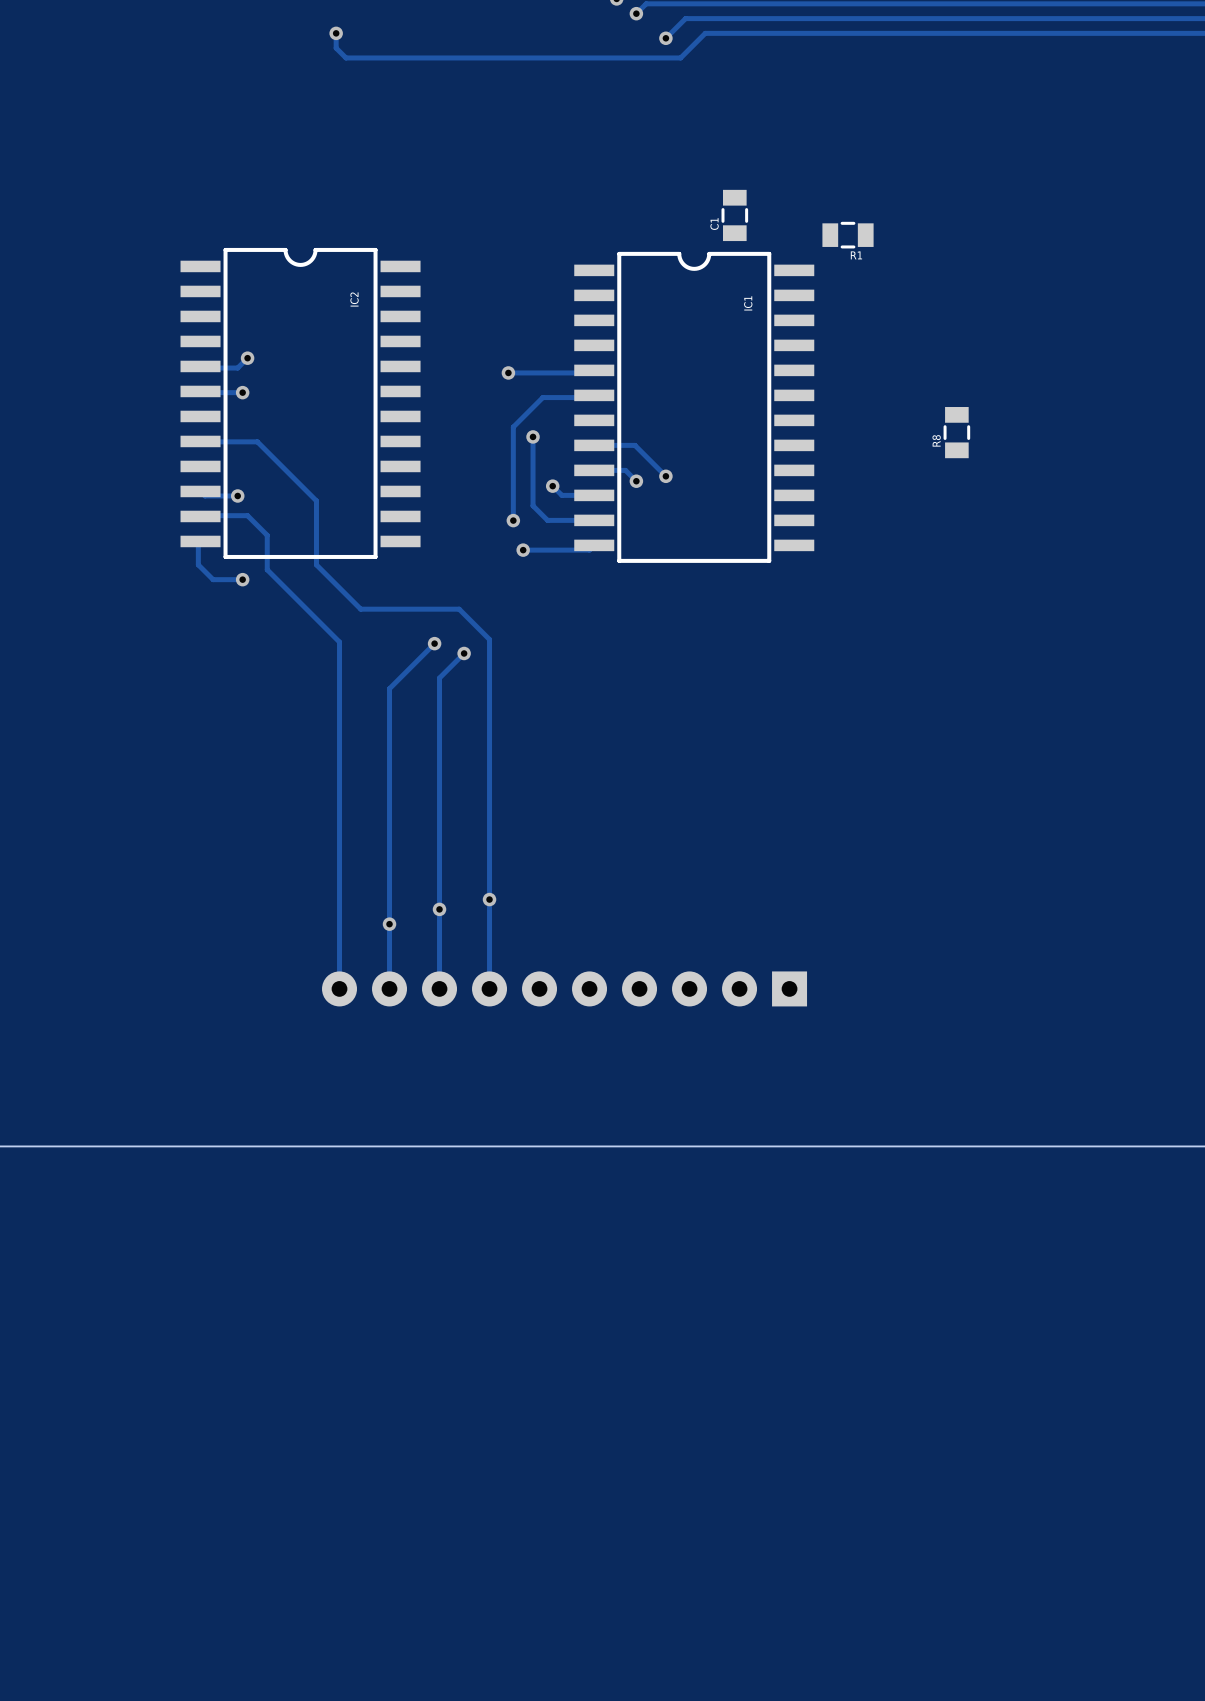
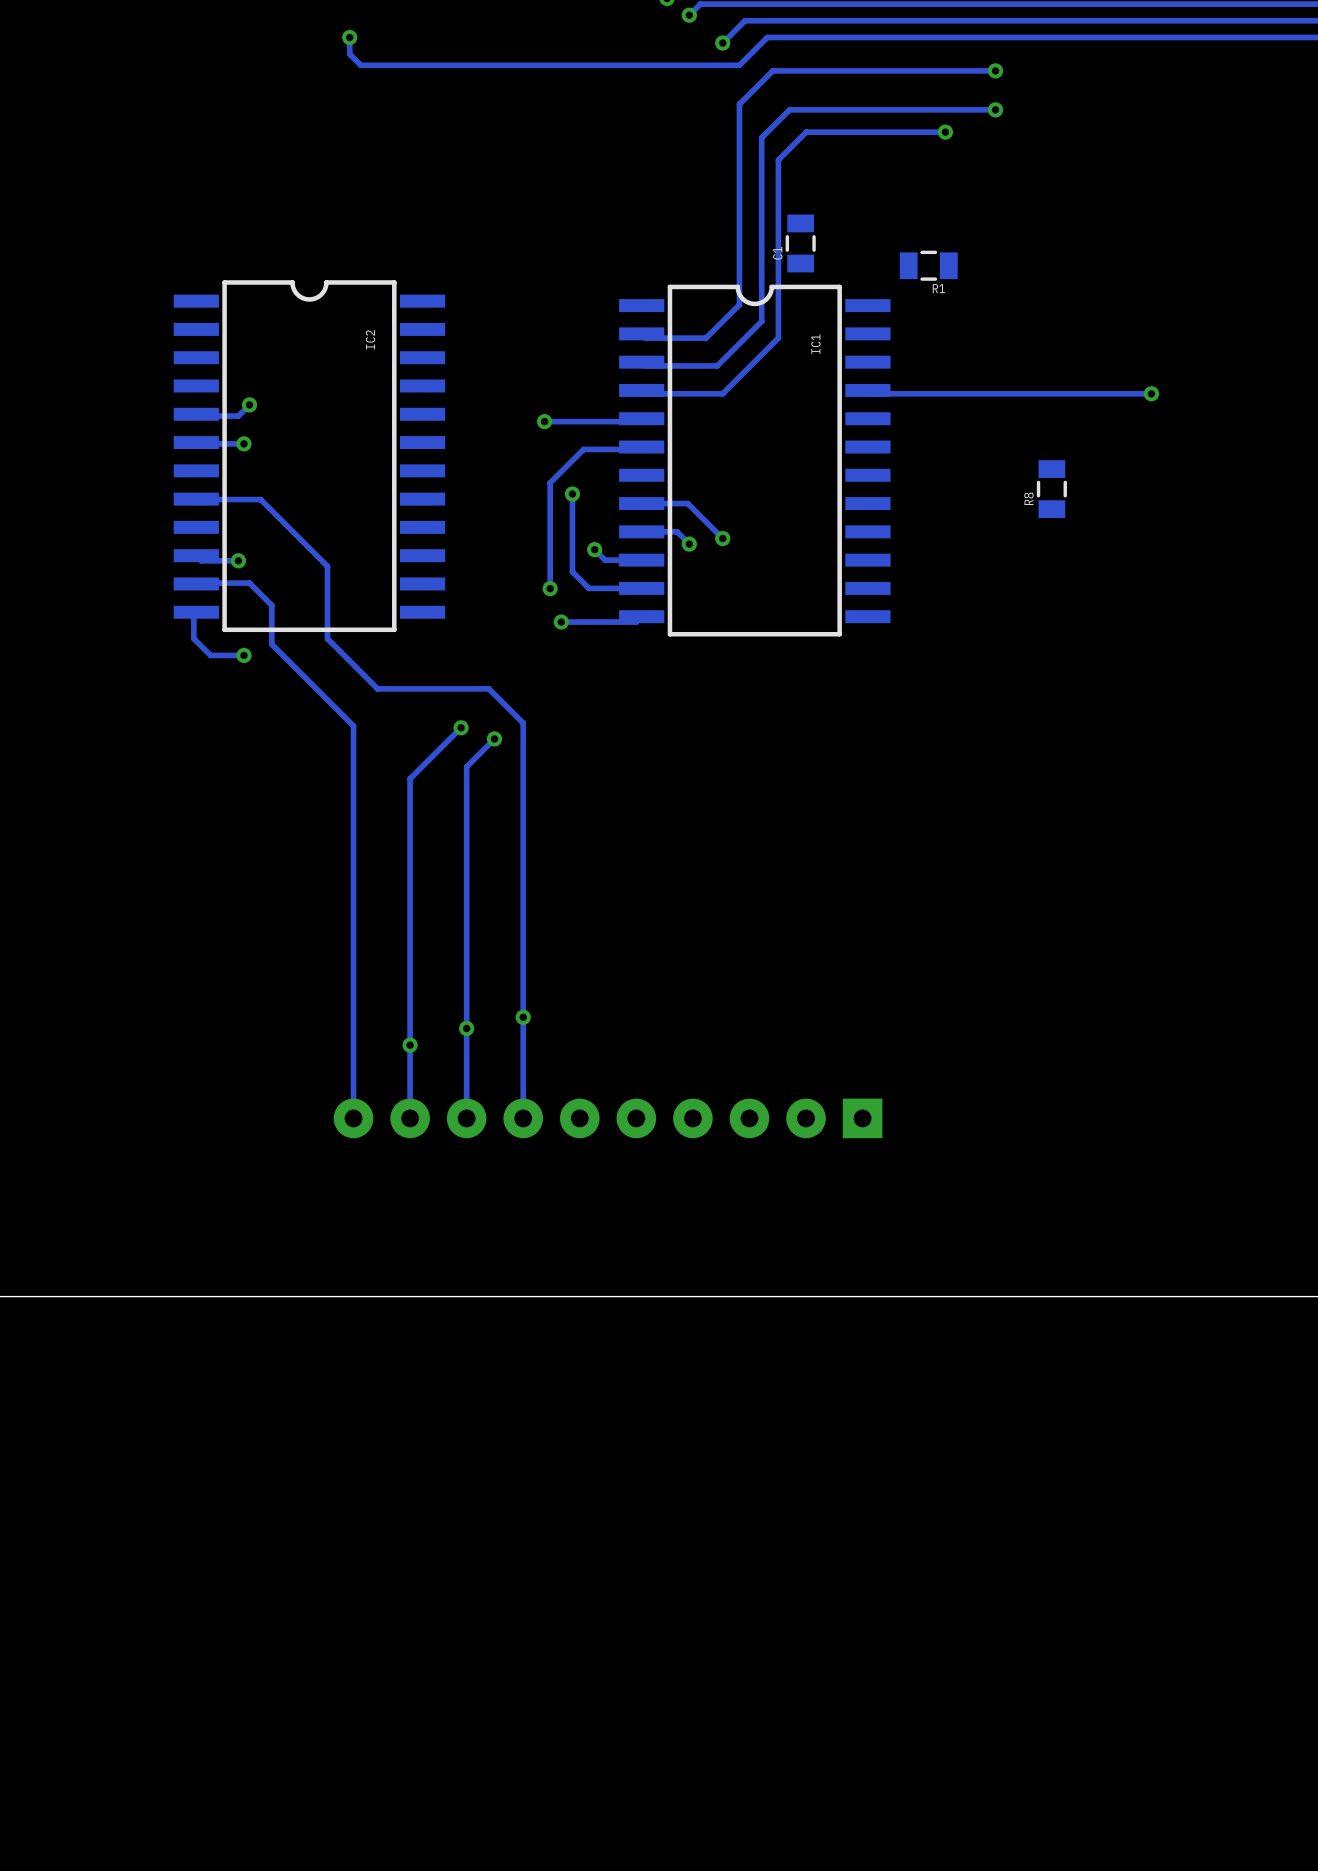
track: none -> (995, 70) (772, 70) (739, 104) (739, 304) (706, 338) (645, 338) (641, 333)
via: none -> (995, 70)
track: none -> (995, 109) (789, 109) (761, 137) (761, 321) (717, 365) (645, 365) (641, 362)
via: none -> (995, 109)
track: none -> (945, 132) (806, 132) (778, 159) (778, 338) (722, 393) (645, 393) (641, 390)
via: none -> (945, 132)
track: none -> (867, 390) (871, 393) (1151, 393)
via: none -> (1151, 393)

